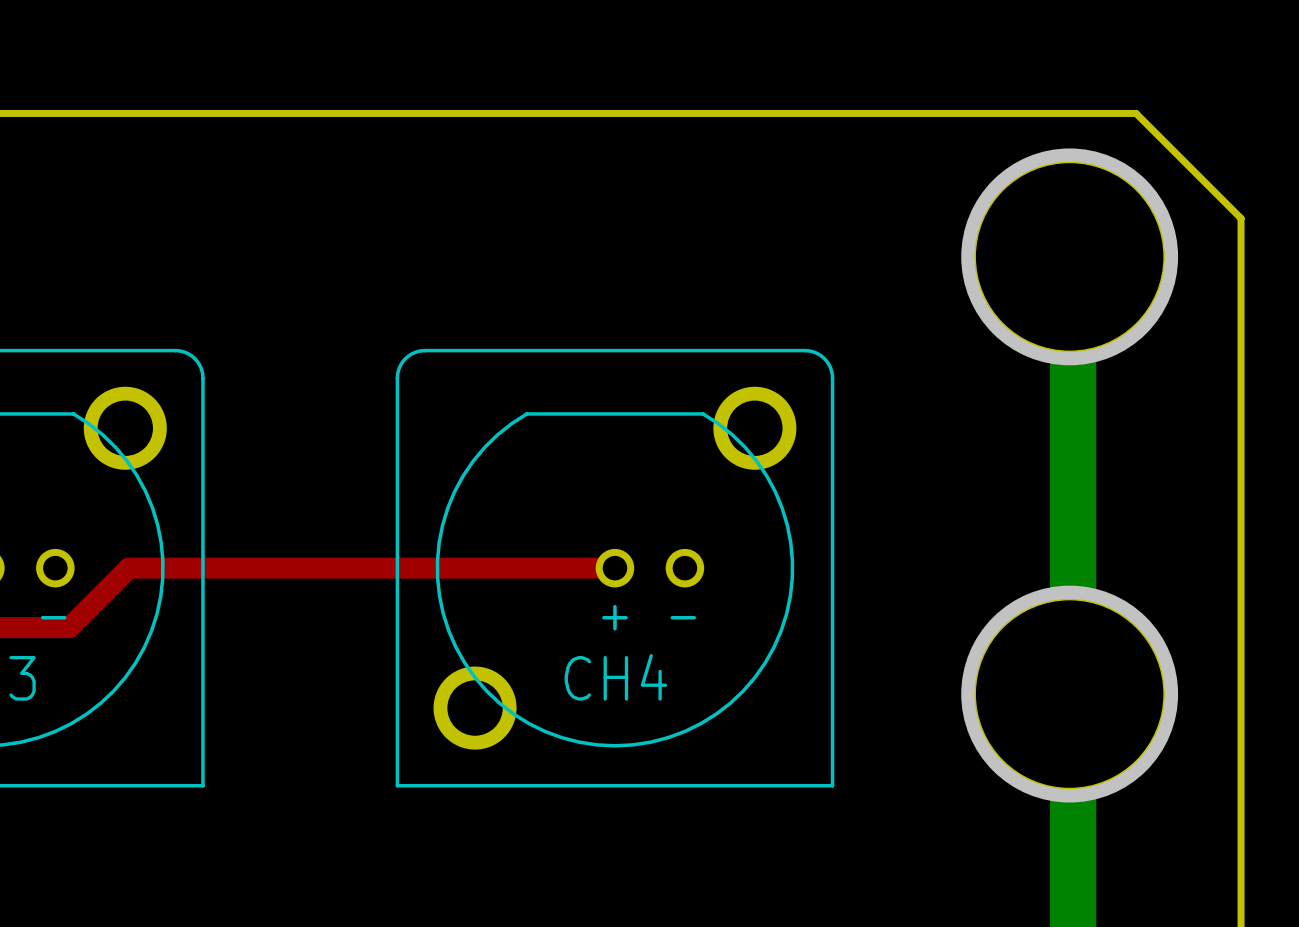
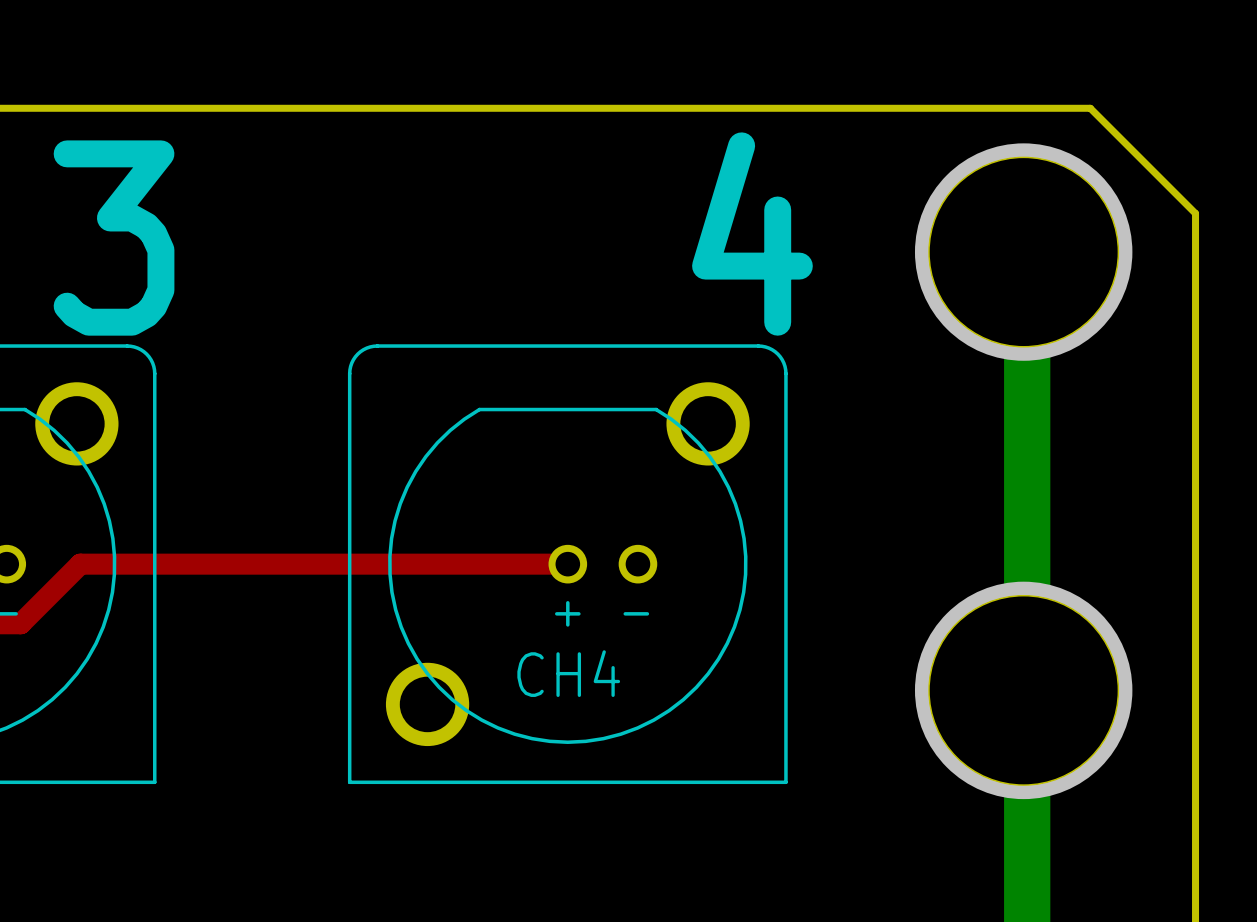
text: none -> 4 (752, 234)
text: none -> 3 (114, 238)

